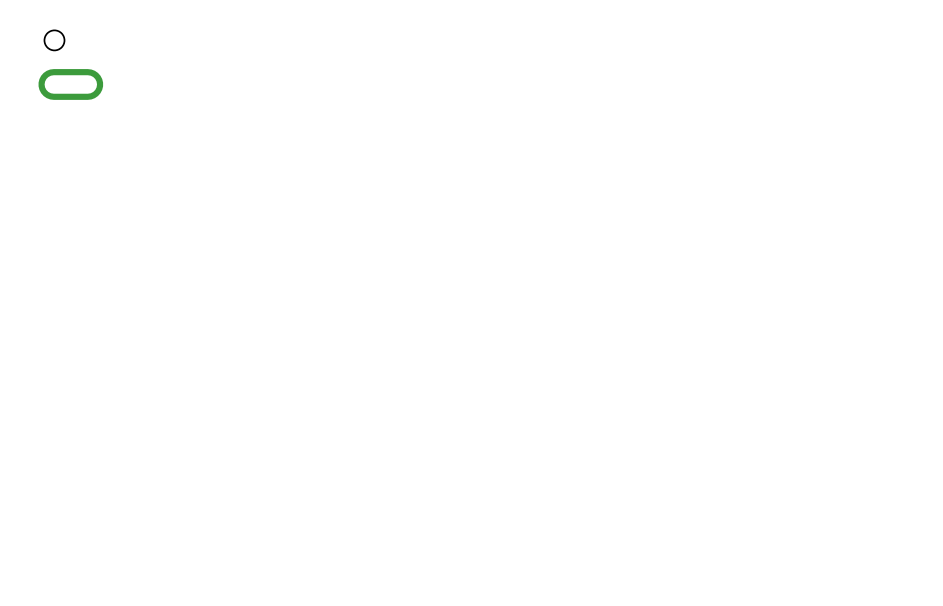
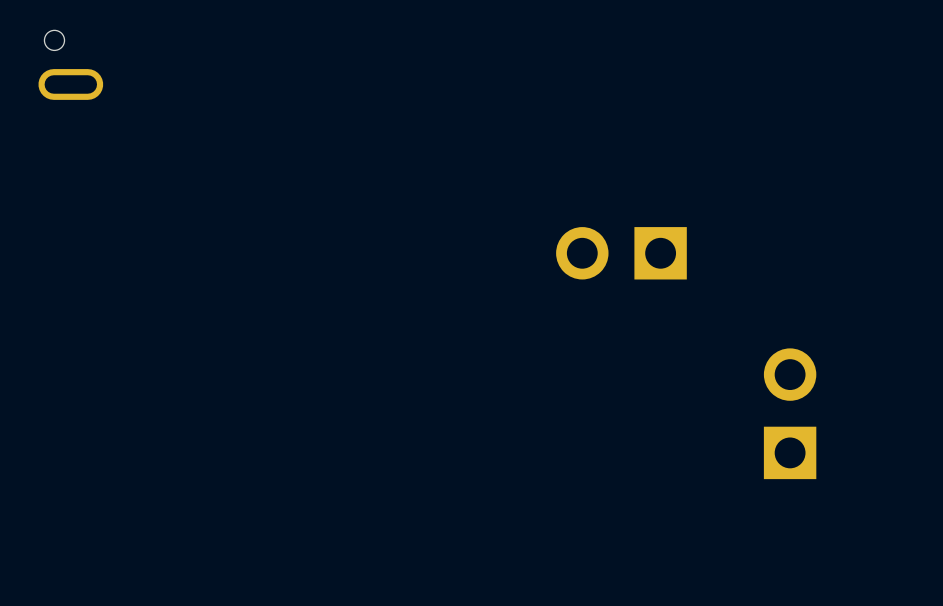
part: none -> (621, 253)
part: none -> (790, 413)

